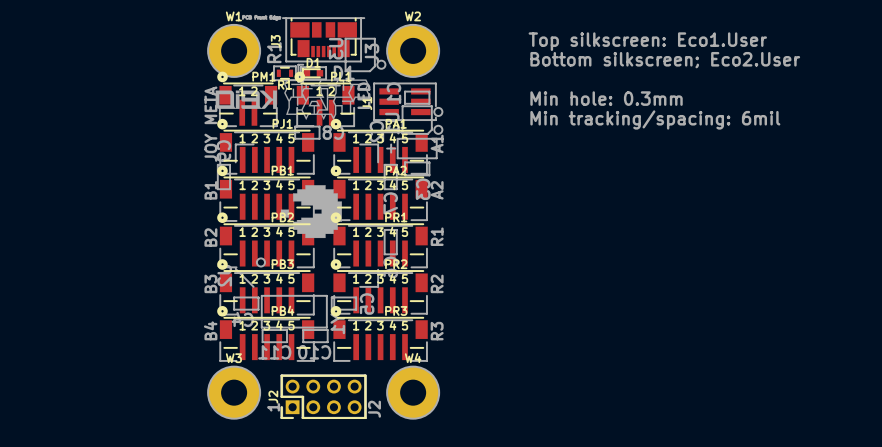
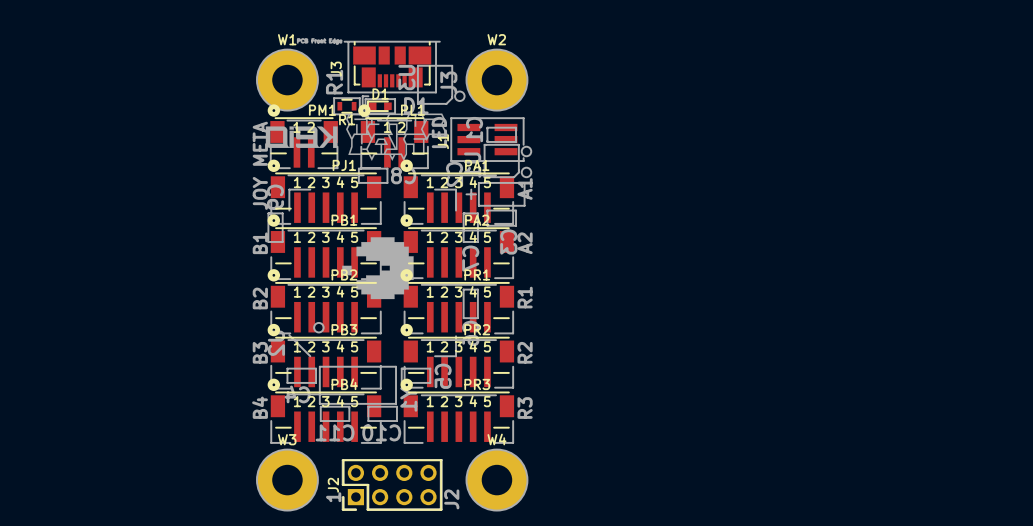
text: Top silkscreen: Eco1.User (647, 41) -> none
text: Bottom silkscreen; Eco2.User (665, 60) -> none
text: Min hole: 0.3mm (606, 98) -> none
text: Min tracking/spacing: 6mil (655, 119) -> none

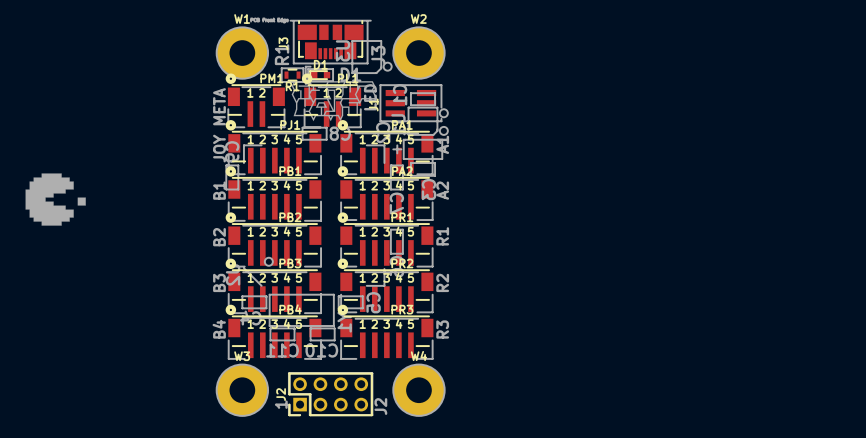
drawing: [265, 126, 338, 149] -> none
drawing: none -> [25, 173, 86, 226]
drawing: [342, 237, 414, 300] -> none

